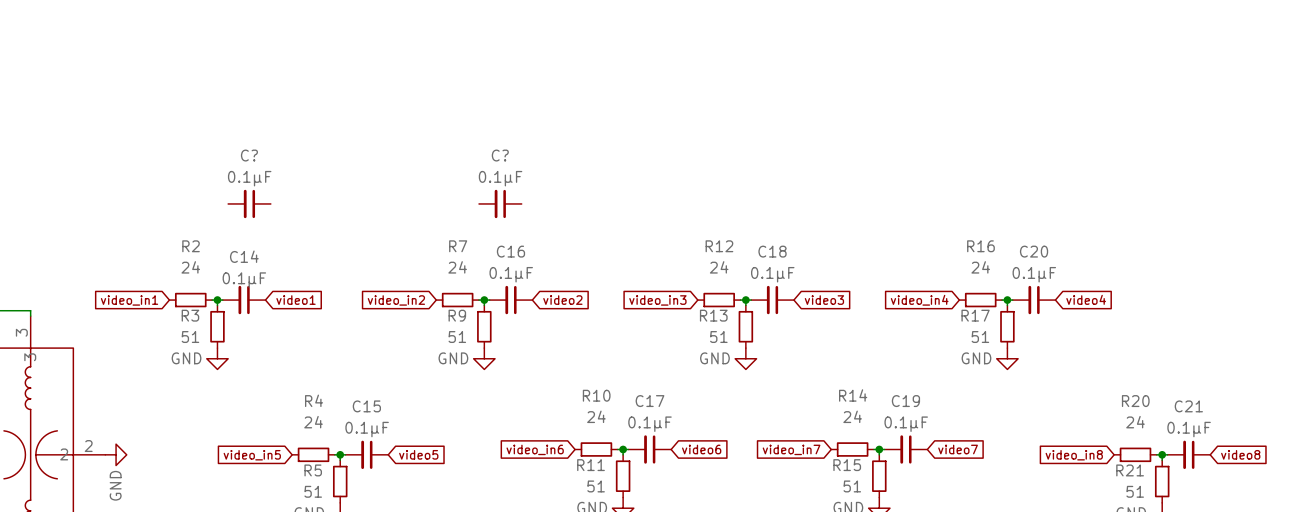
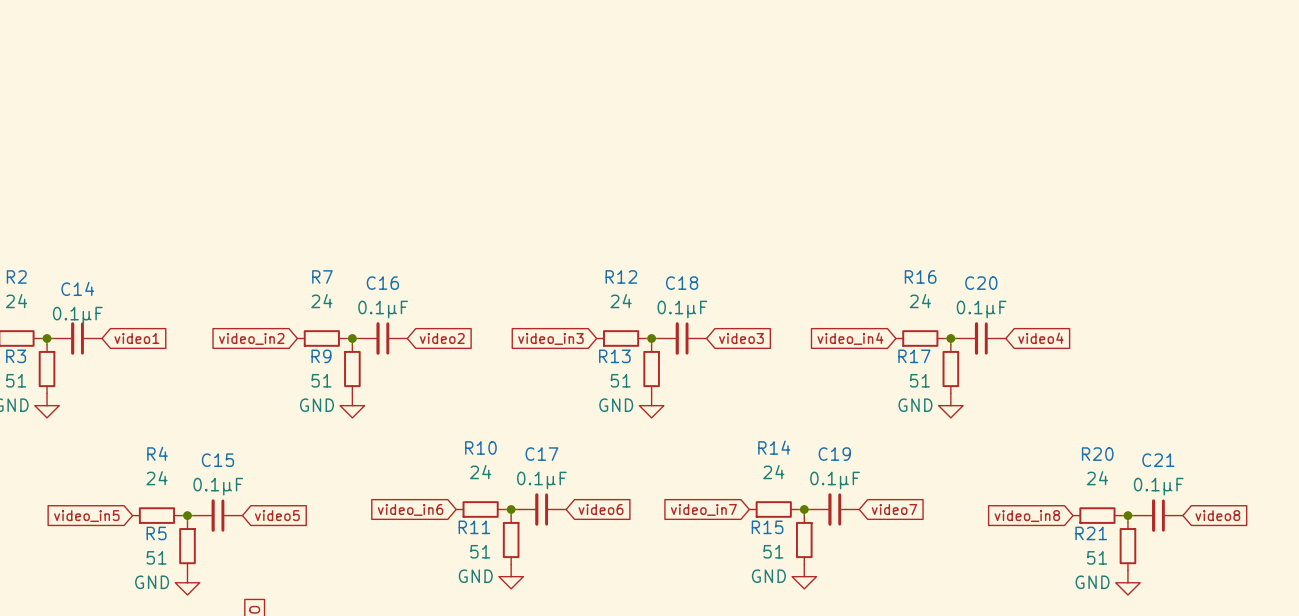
C?: 0.1μF (249, 203) -> none
C?: 0.1μF (500, 203) -> none

